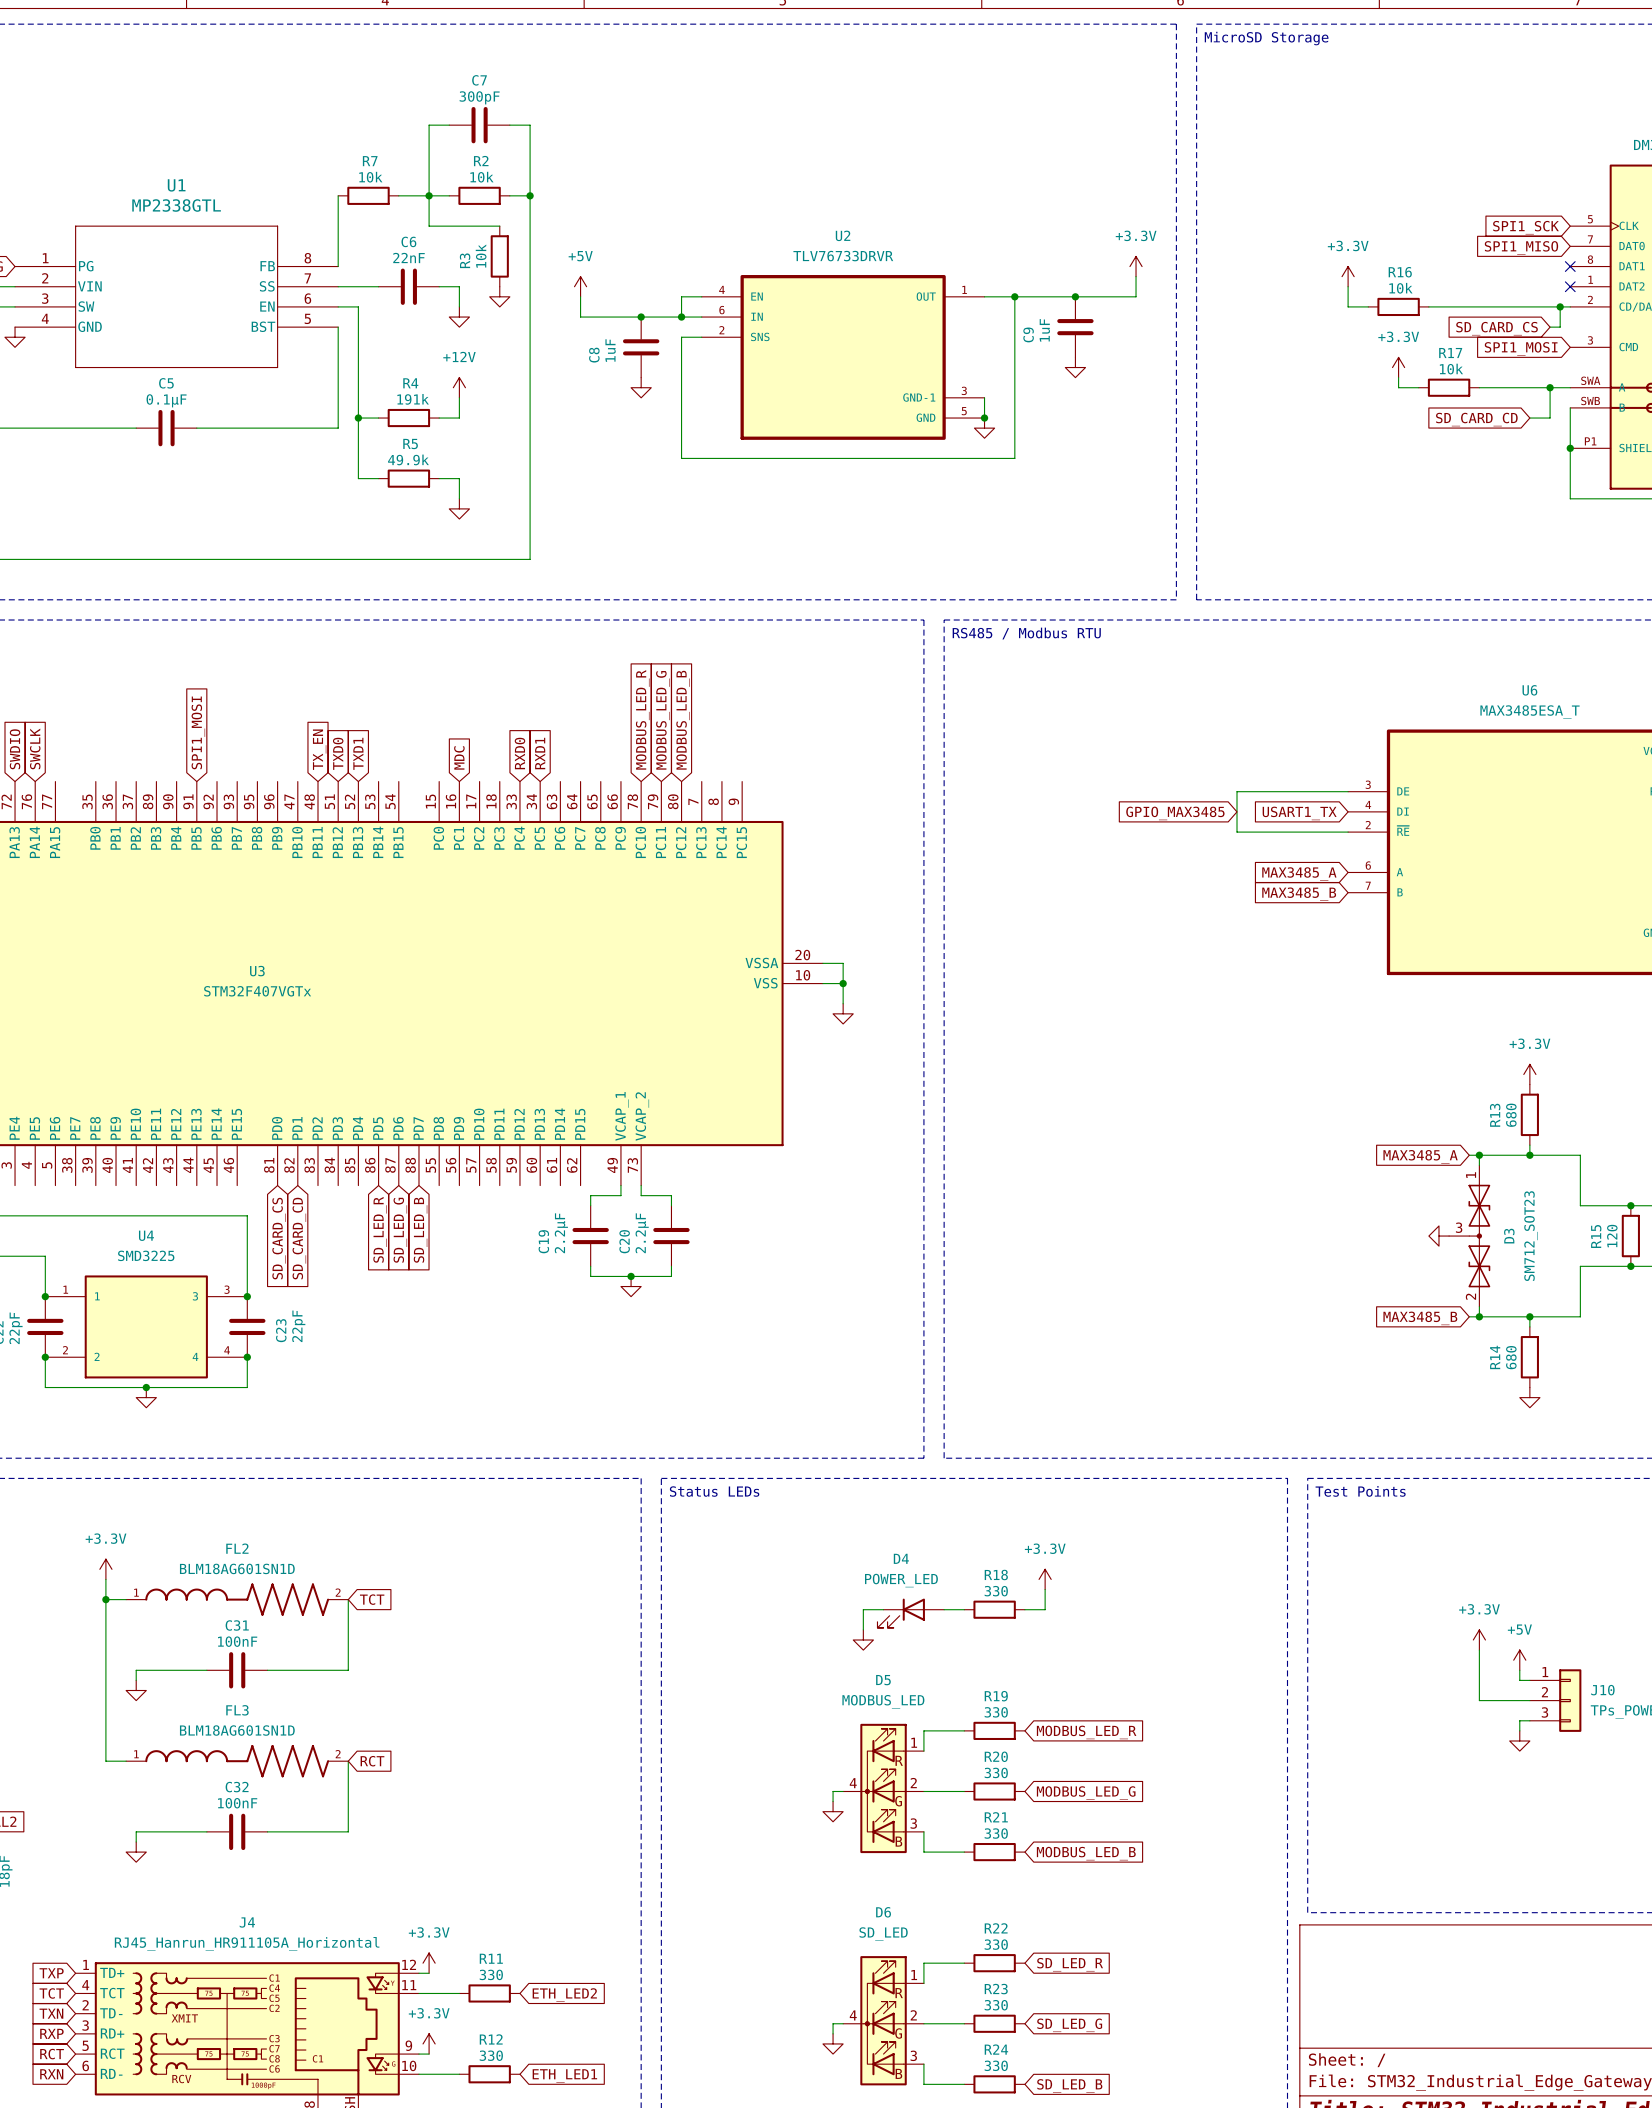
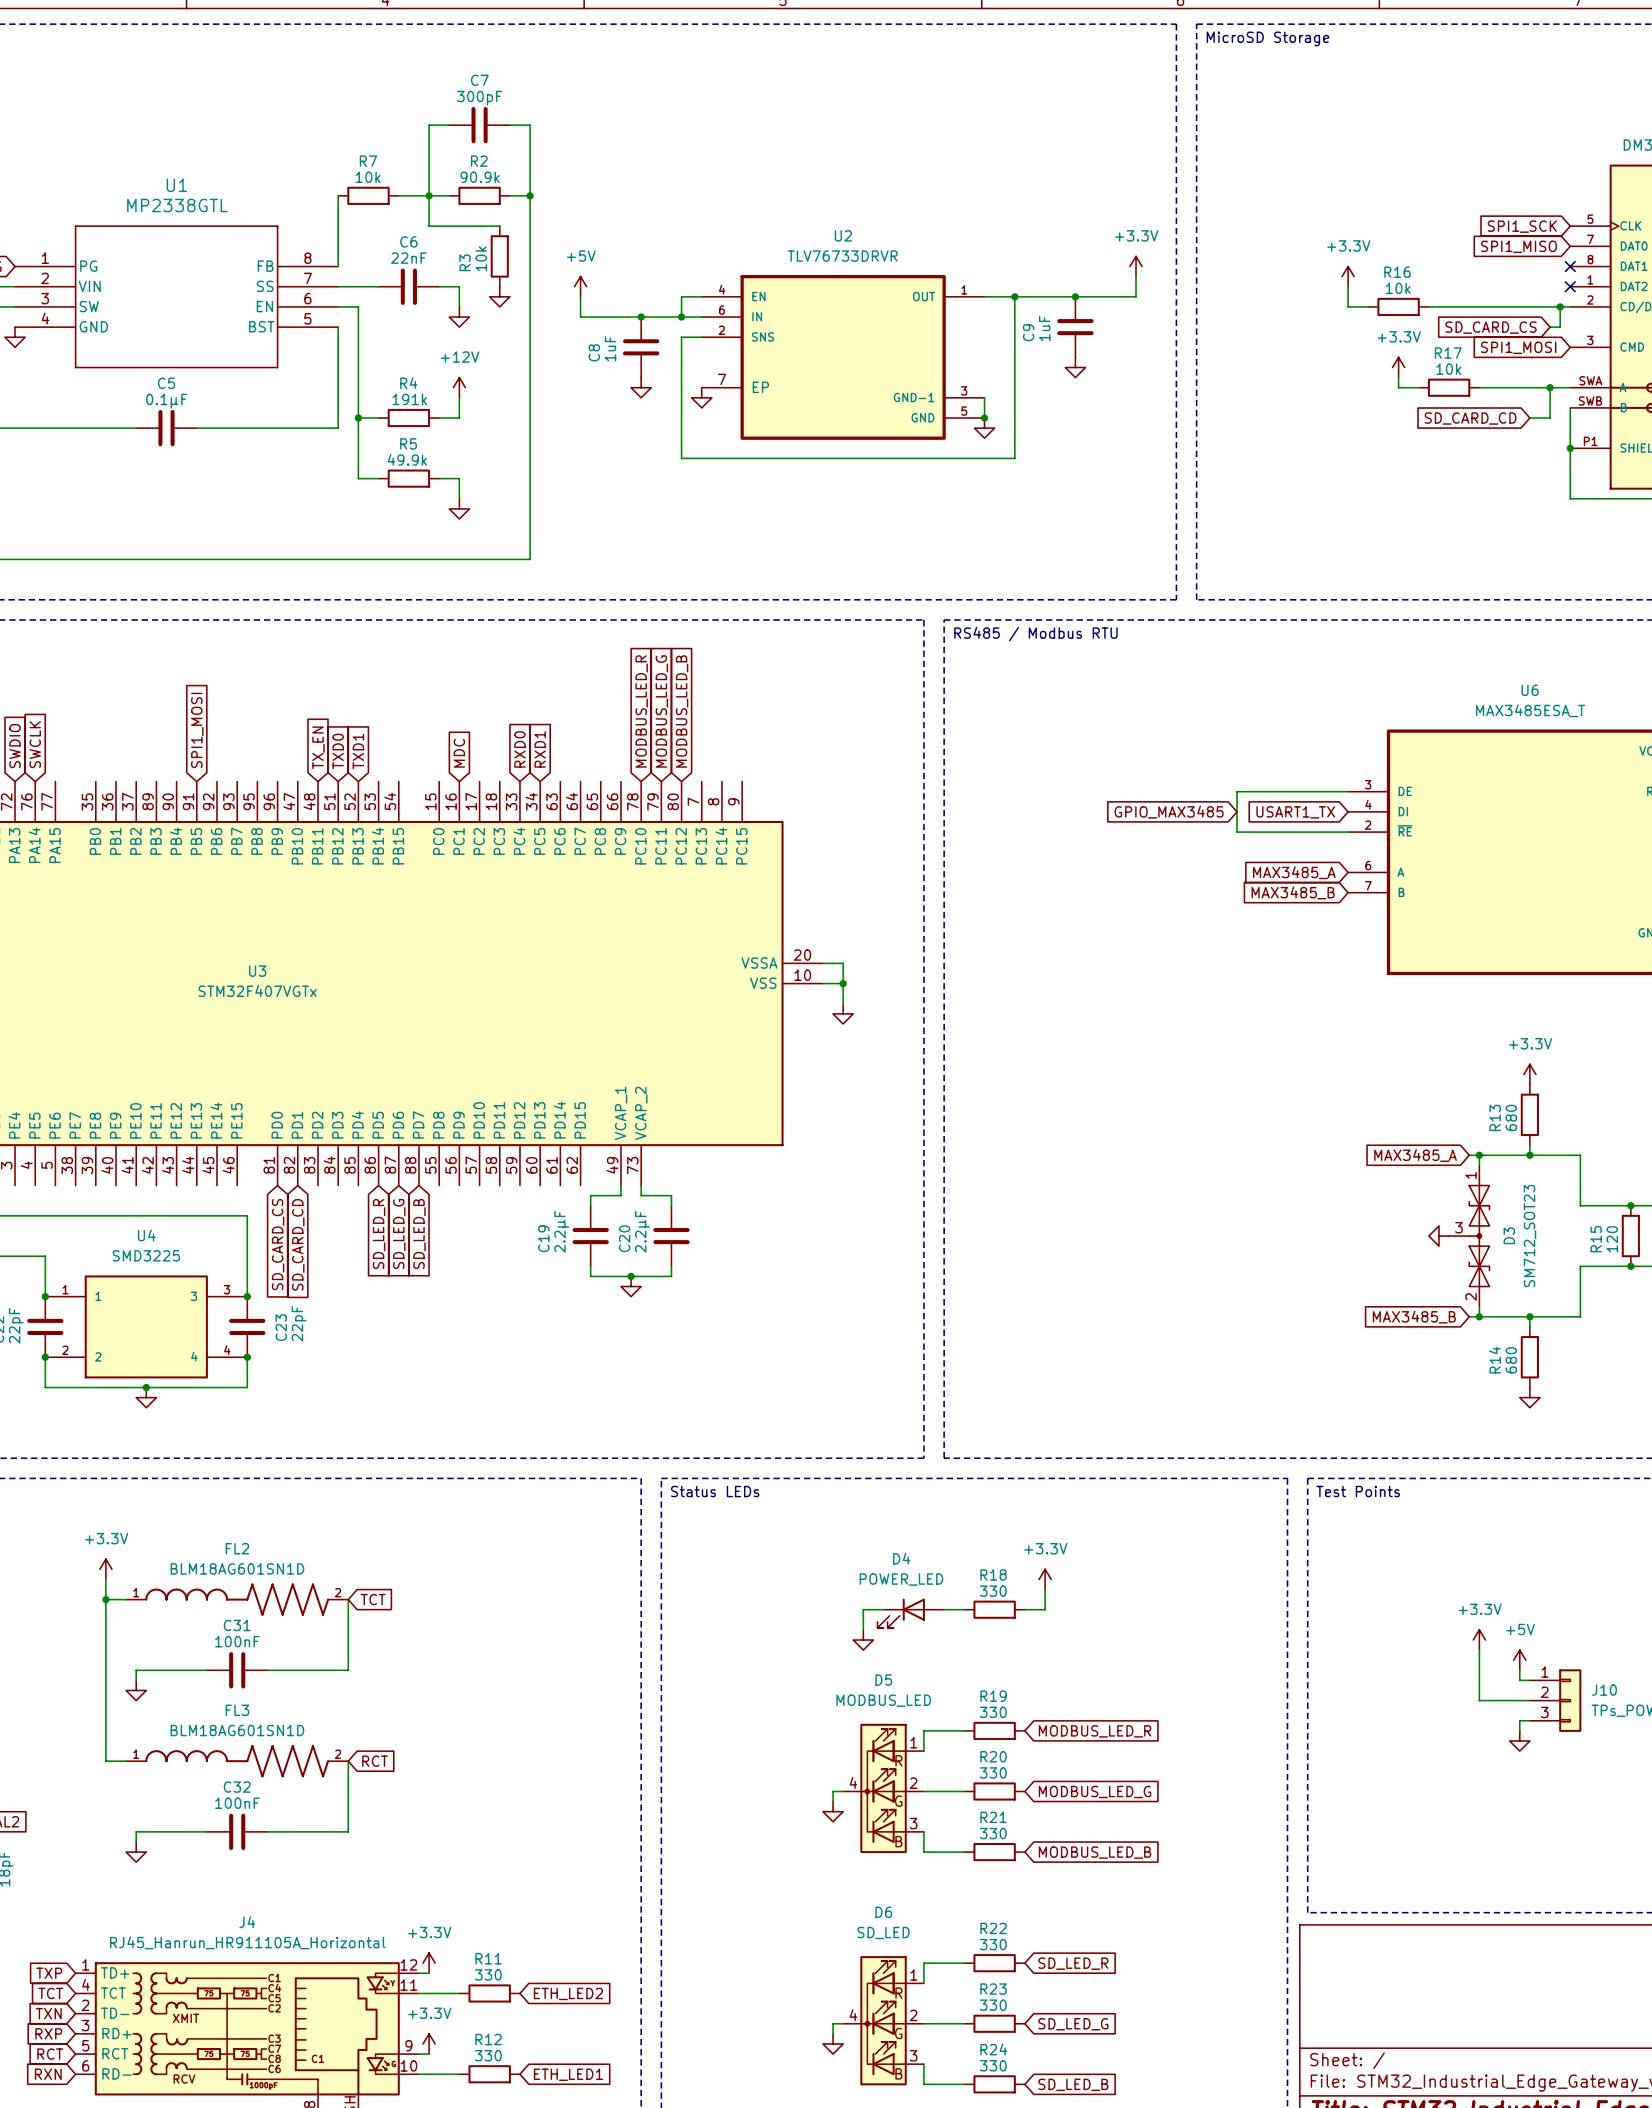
R2 value: 10k (481, 177) -> 90.9k (480, 177)
U2 symbol: [701, 275, 985, 440] -> [701, 275, 985, 440]
power symbol: none -> (701, 397)

